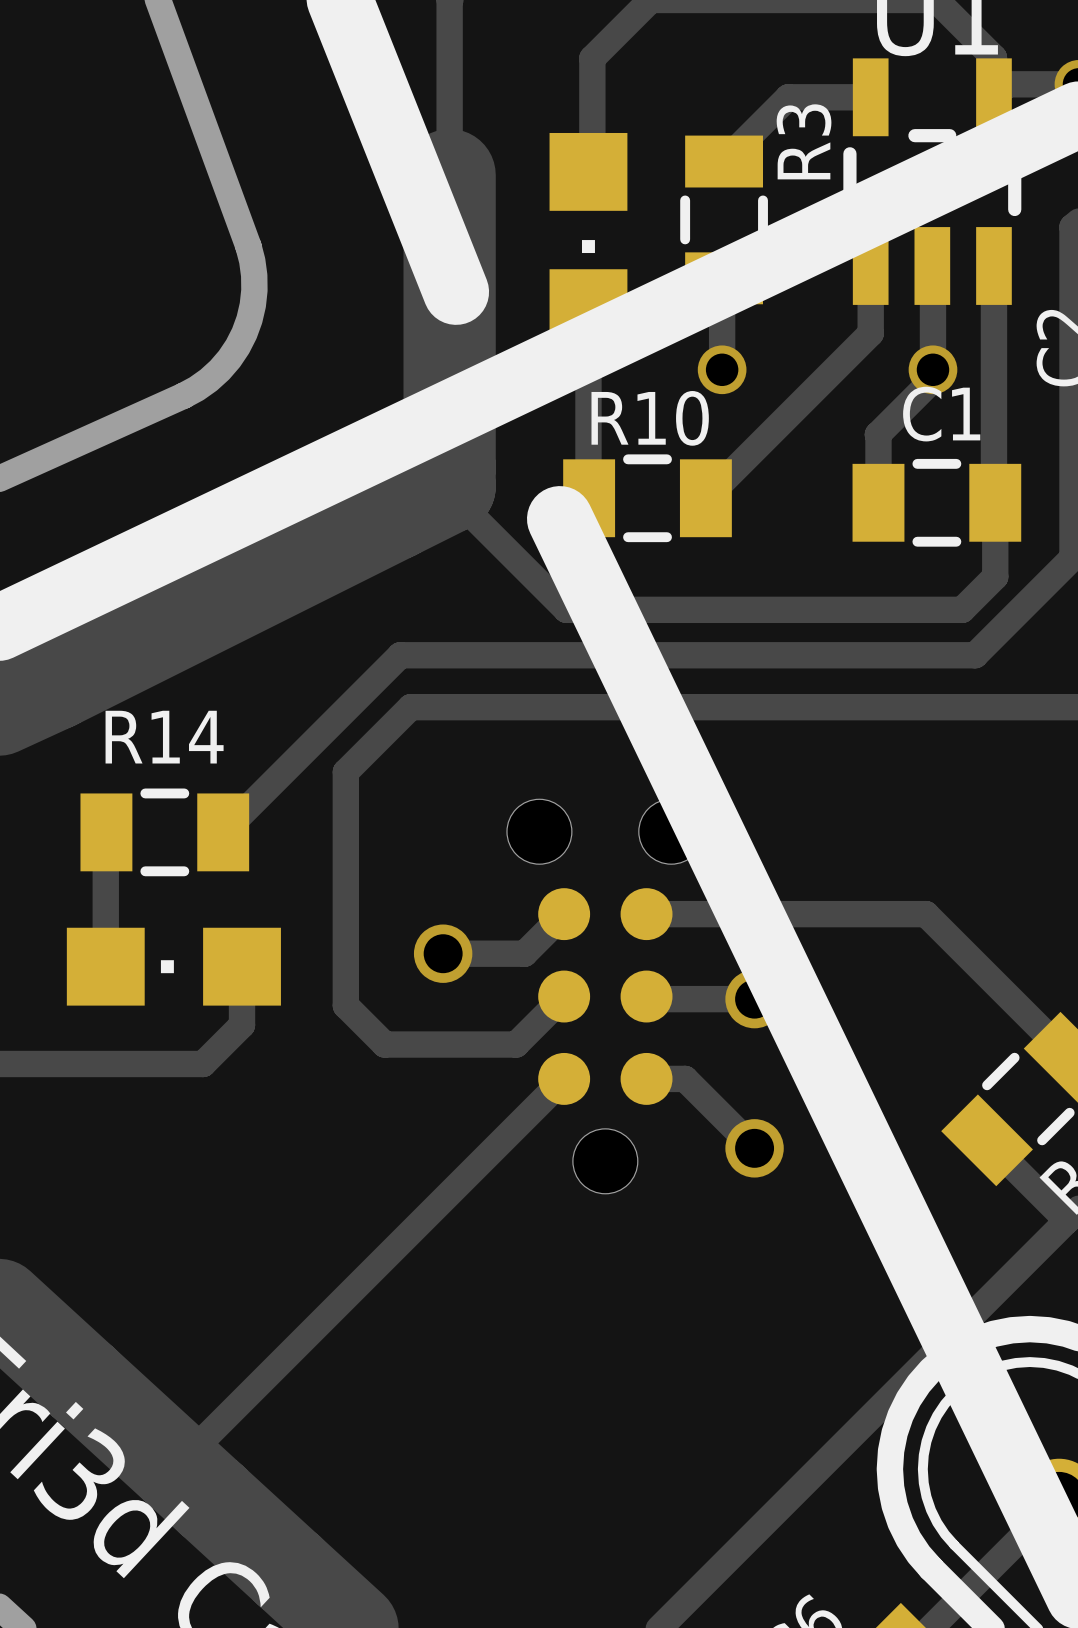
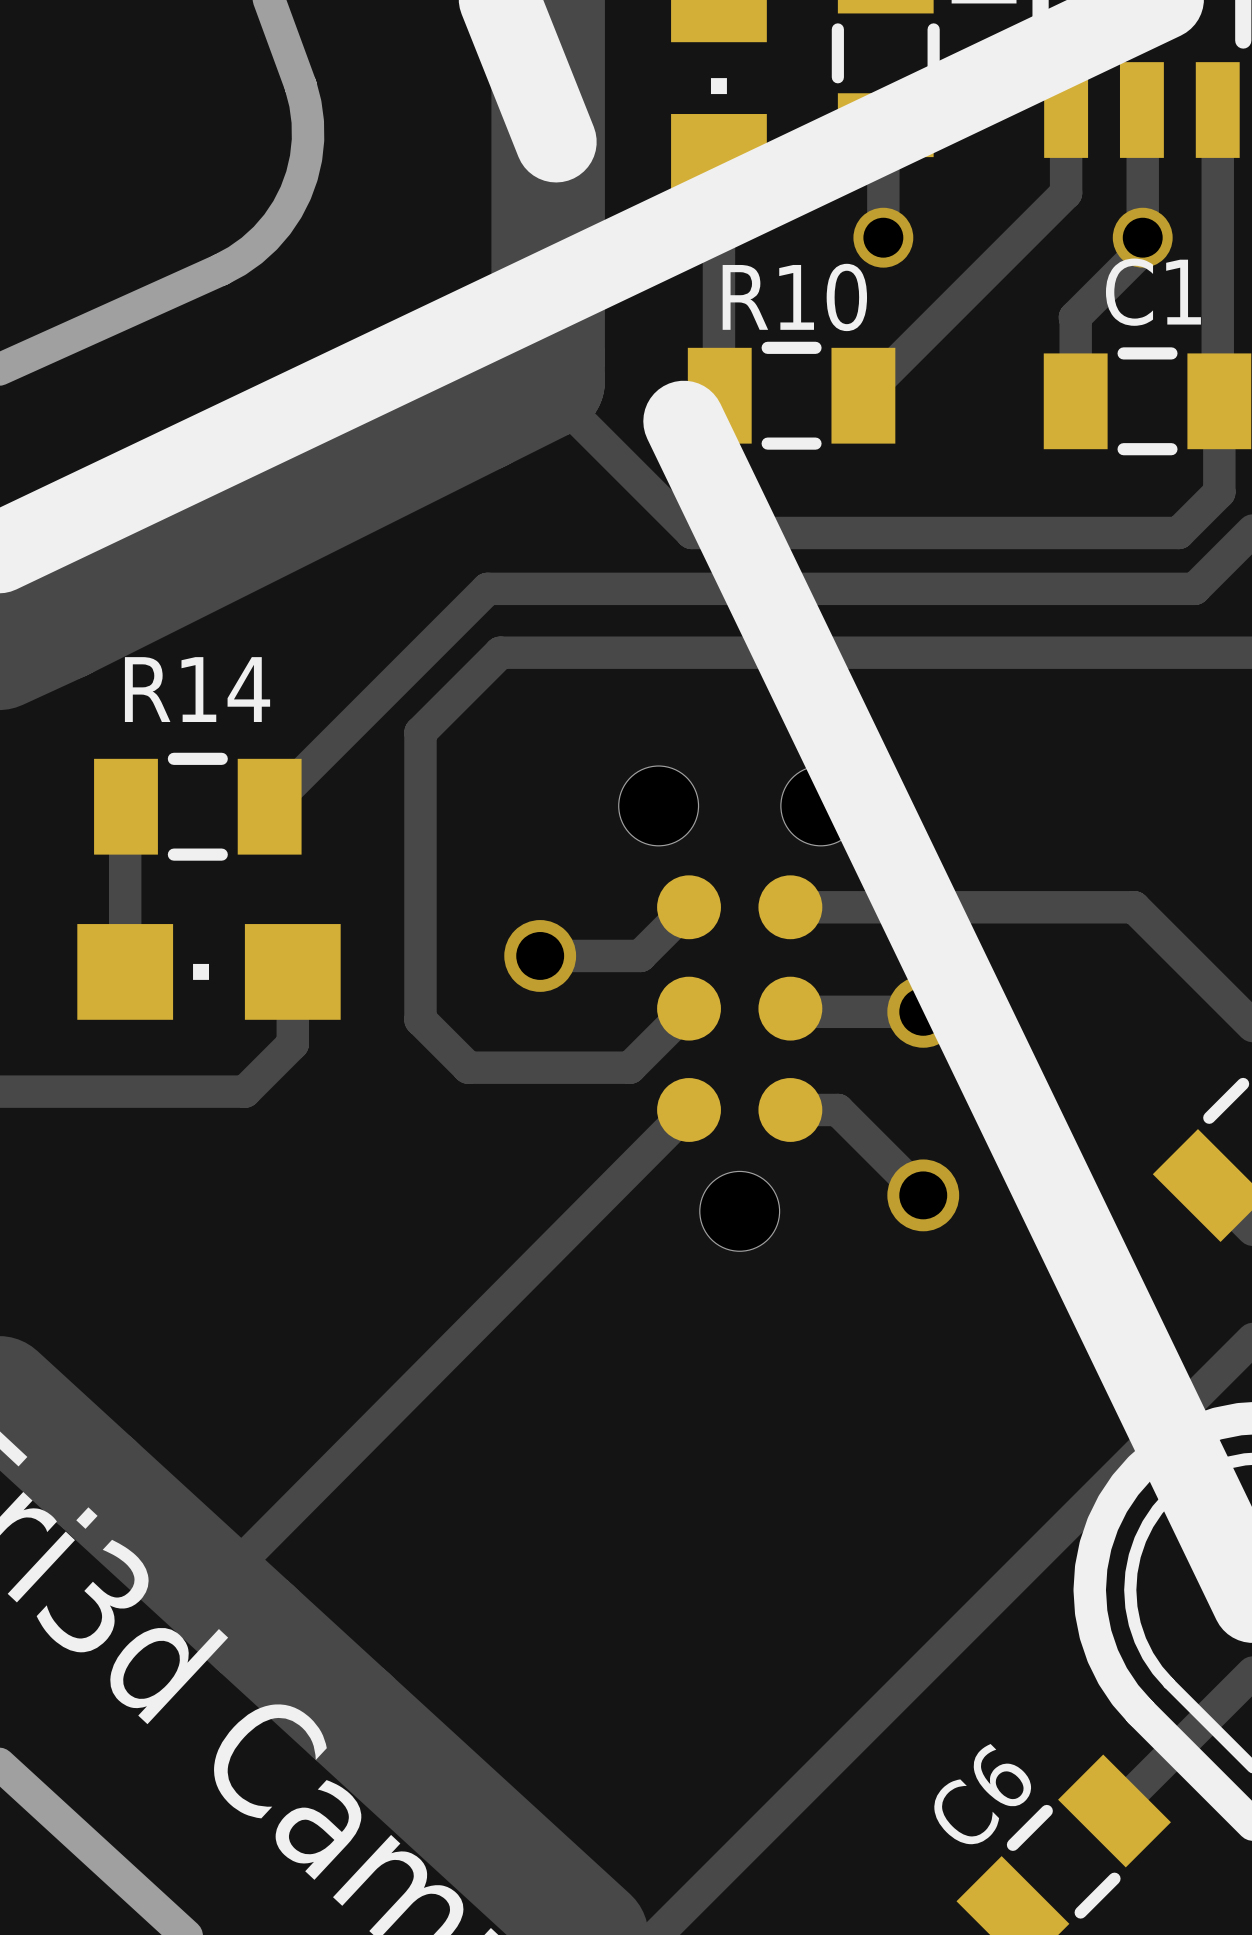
track: (564, 1078) (176, 1467) -> (689, 1109) (229, 1572)

